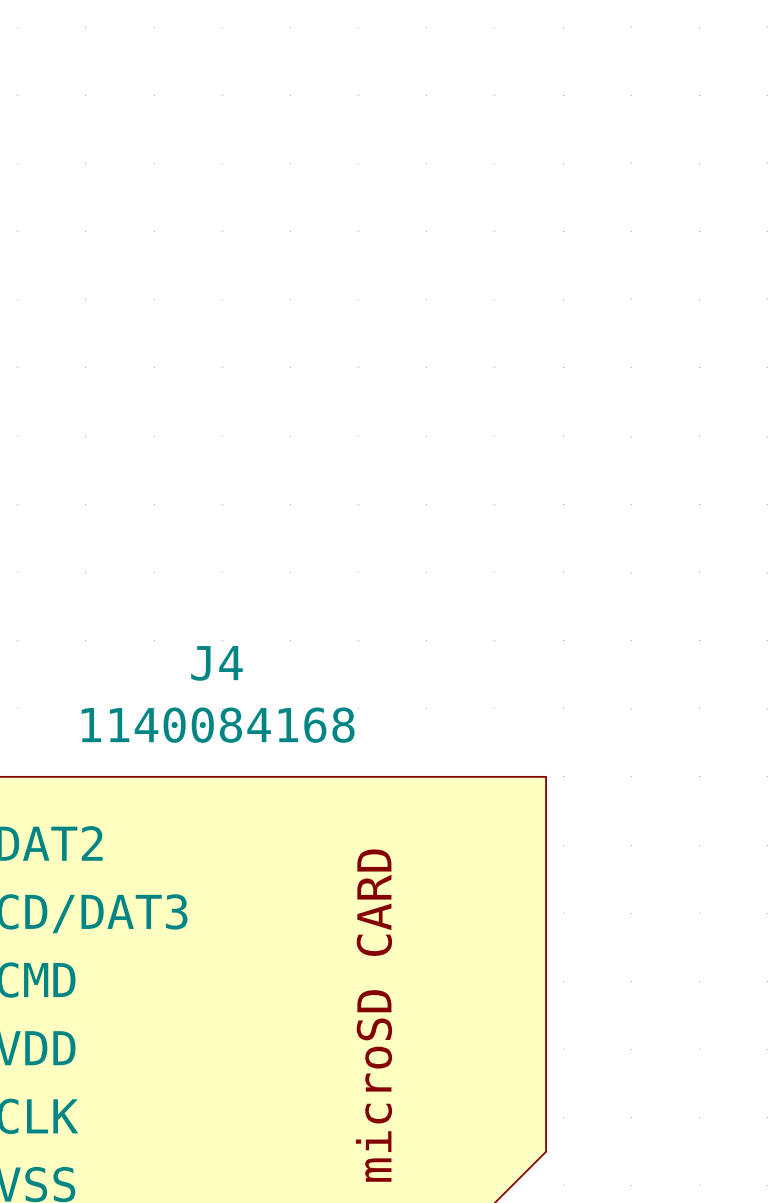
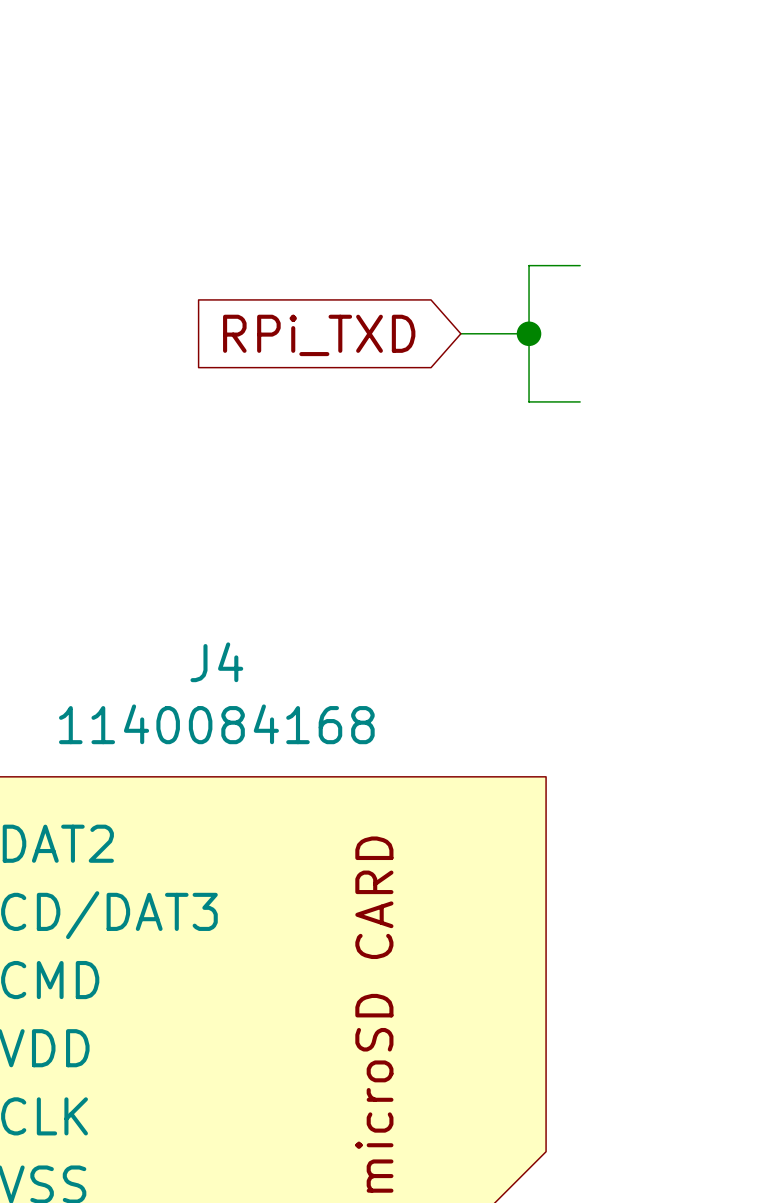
wire: none -> (580, 265) (529, 265) (529, 401) (580, 401)
wire: none -> (460, 333) (529, 333)
junction: none -> (529, 333)
global label: none -> RPi_TXD (319, 335)

